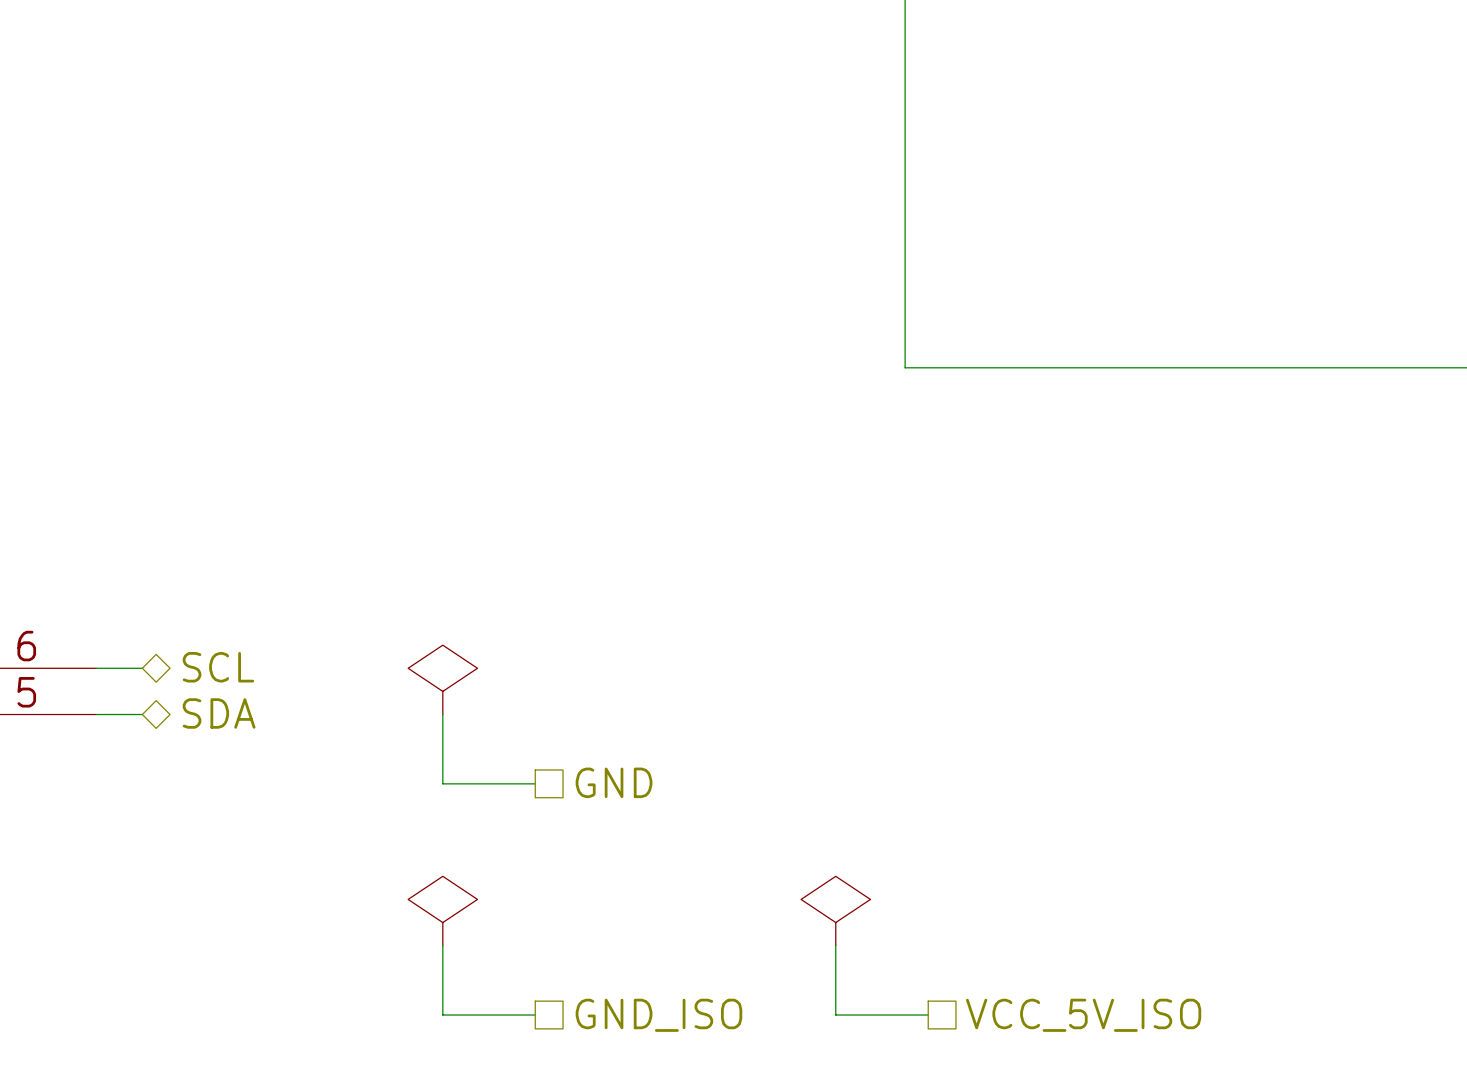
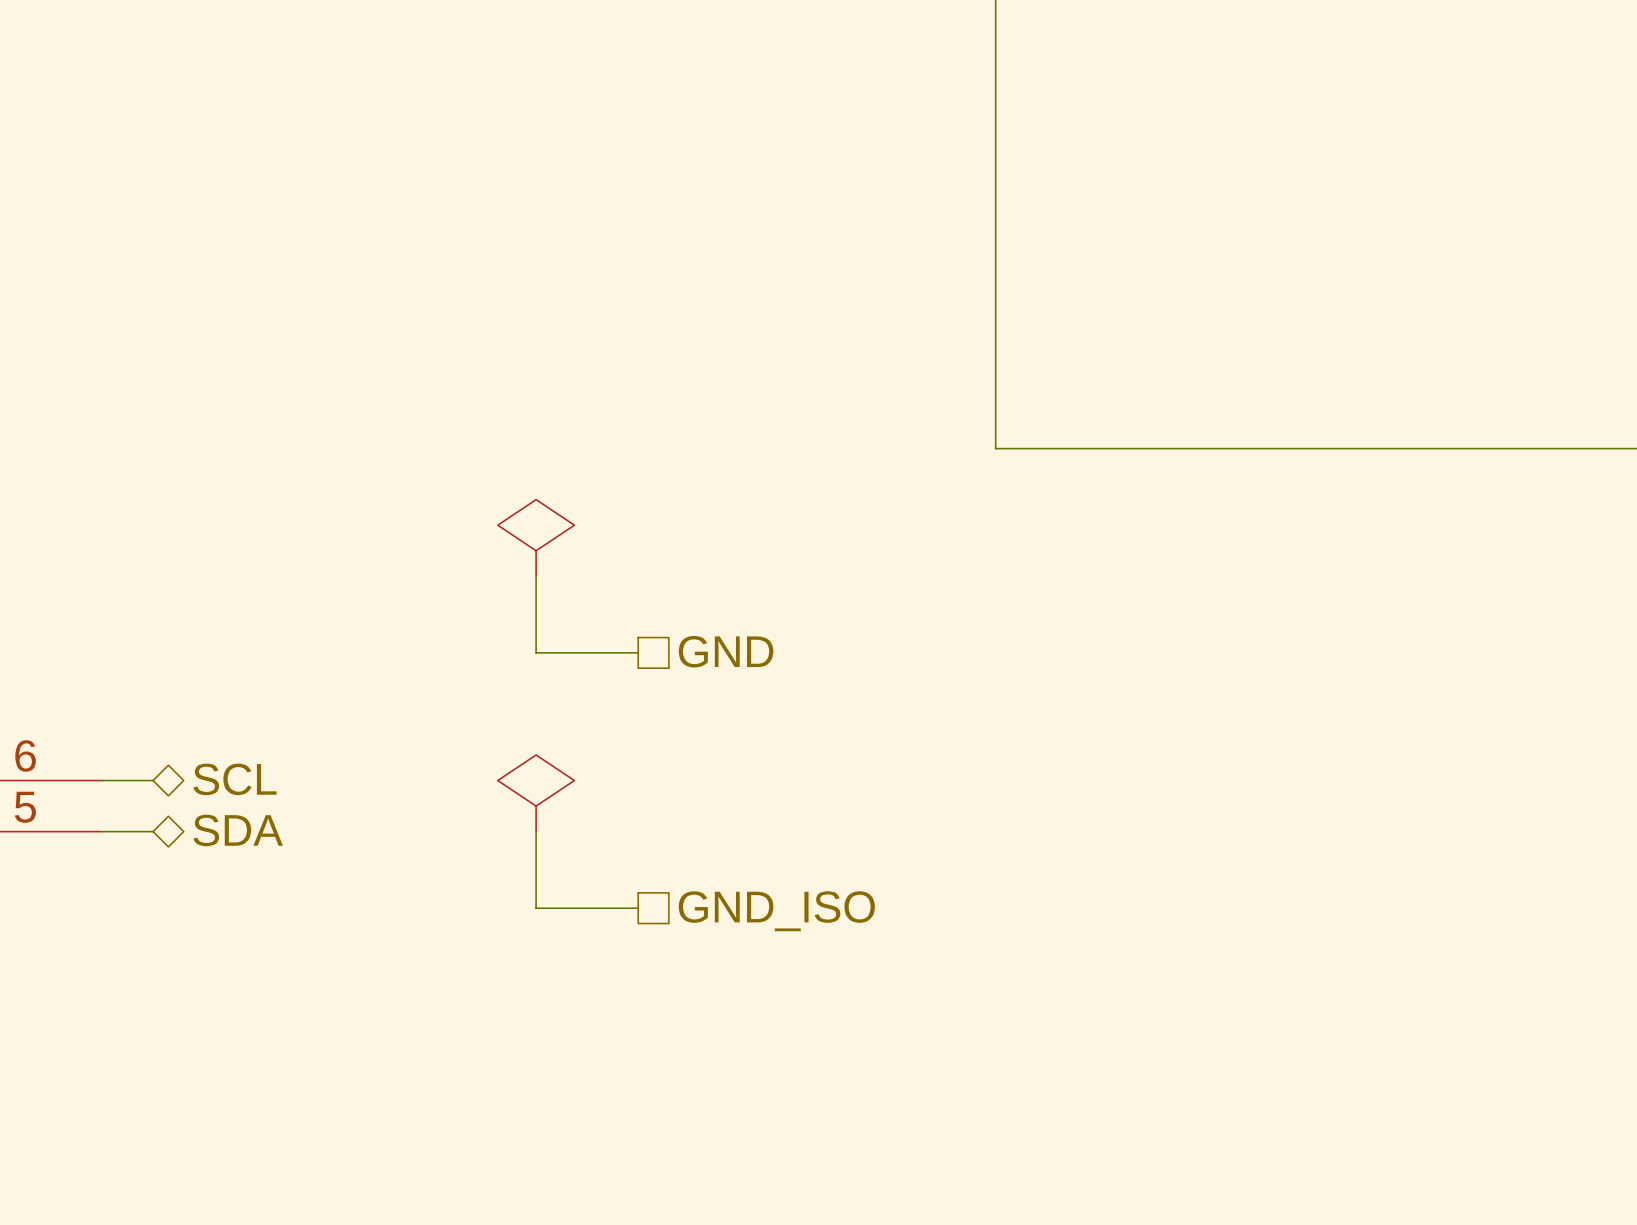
power symbol: none -> (536, 537)
wire: none -> (536, 576) (536, 652) (638, 652)
power symbol position: (442, 679) -> (536, 793)
wire: (442, 714) (442, 783) (489, 783) -> (536, 831) (536, 908)
hierarchical label position: GND (614, 782) -> GND (726, 651)
wire: none -> (587, 908) (638, 908)
power symbol: (442, 910) -> none
power symbol: (835, 910) -> none
wire: (442, 945) (442, 1015) (535, 1015) -> none
wire: (835, 945) (835, 1015) (928, 1015) -> none
hierarchical label position: GND_ISO (658, 1015) -> GND_ISO (776, 911)
hierarchical label: VCC_5V_ISO (1083, 1015) -> none

